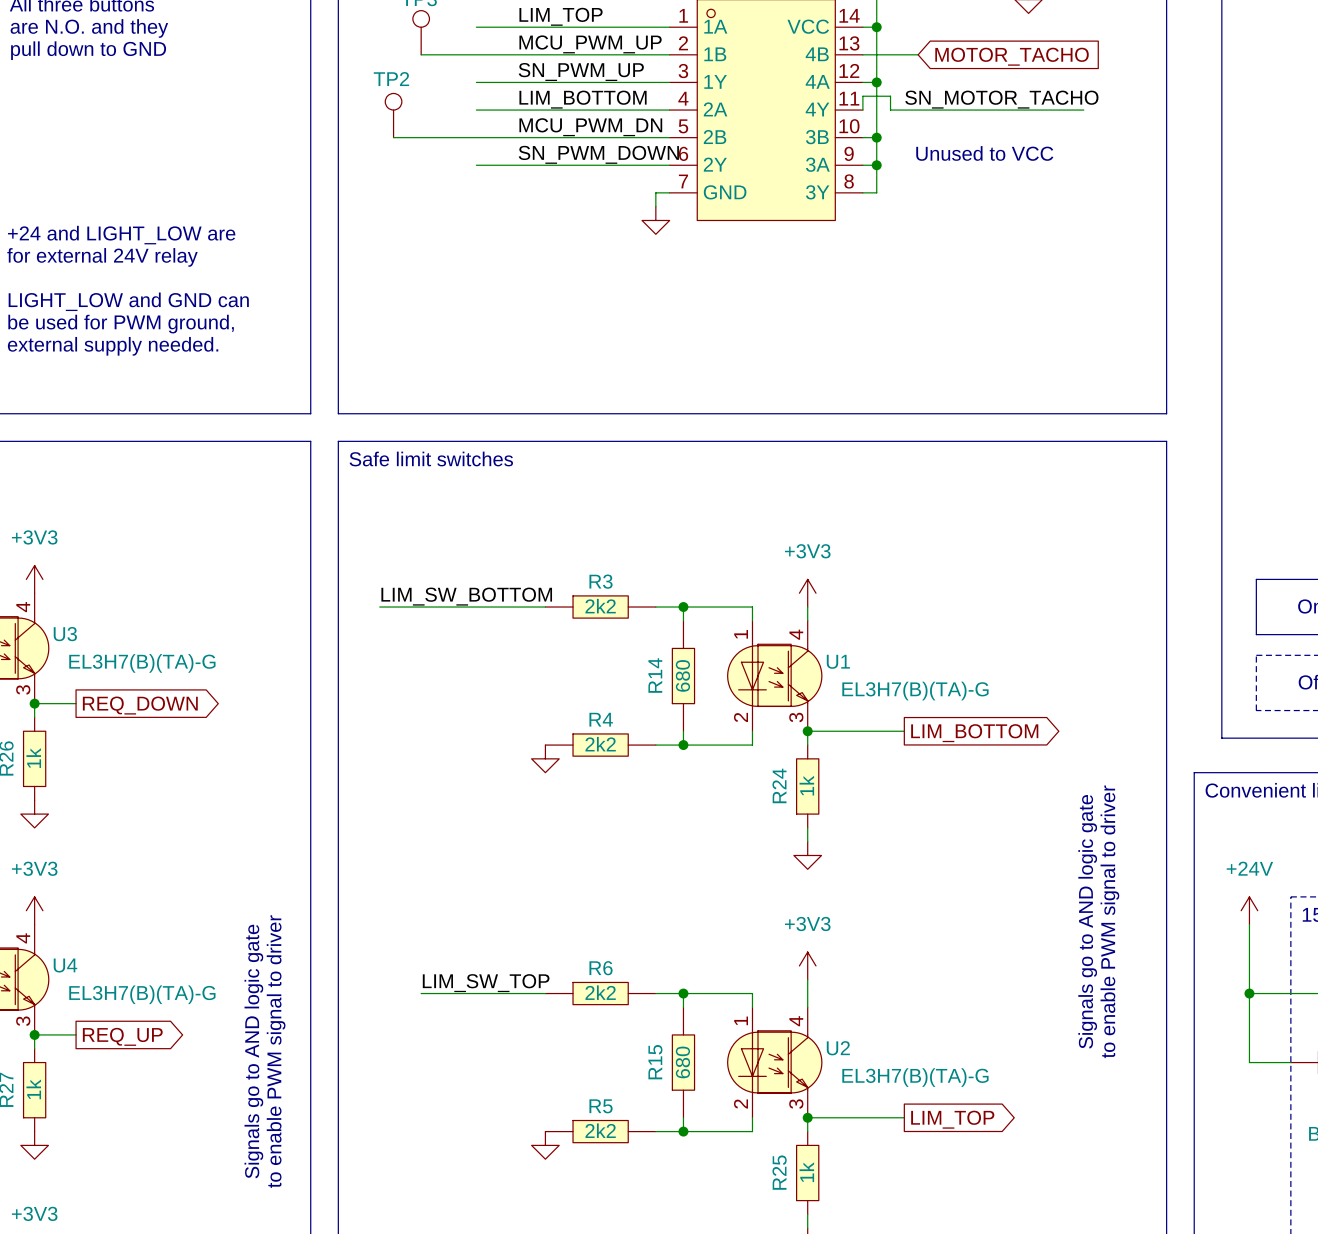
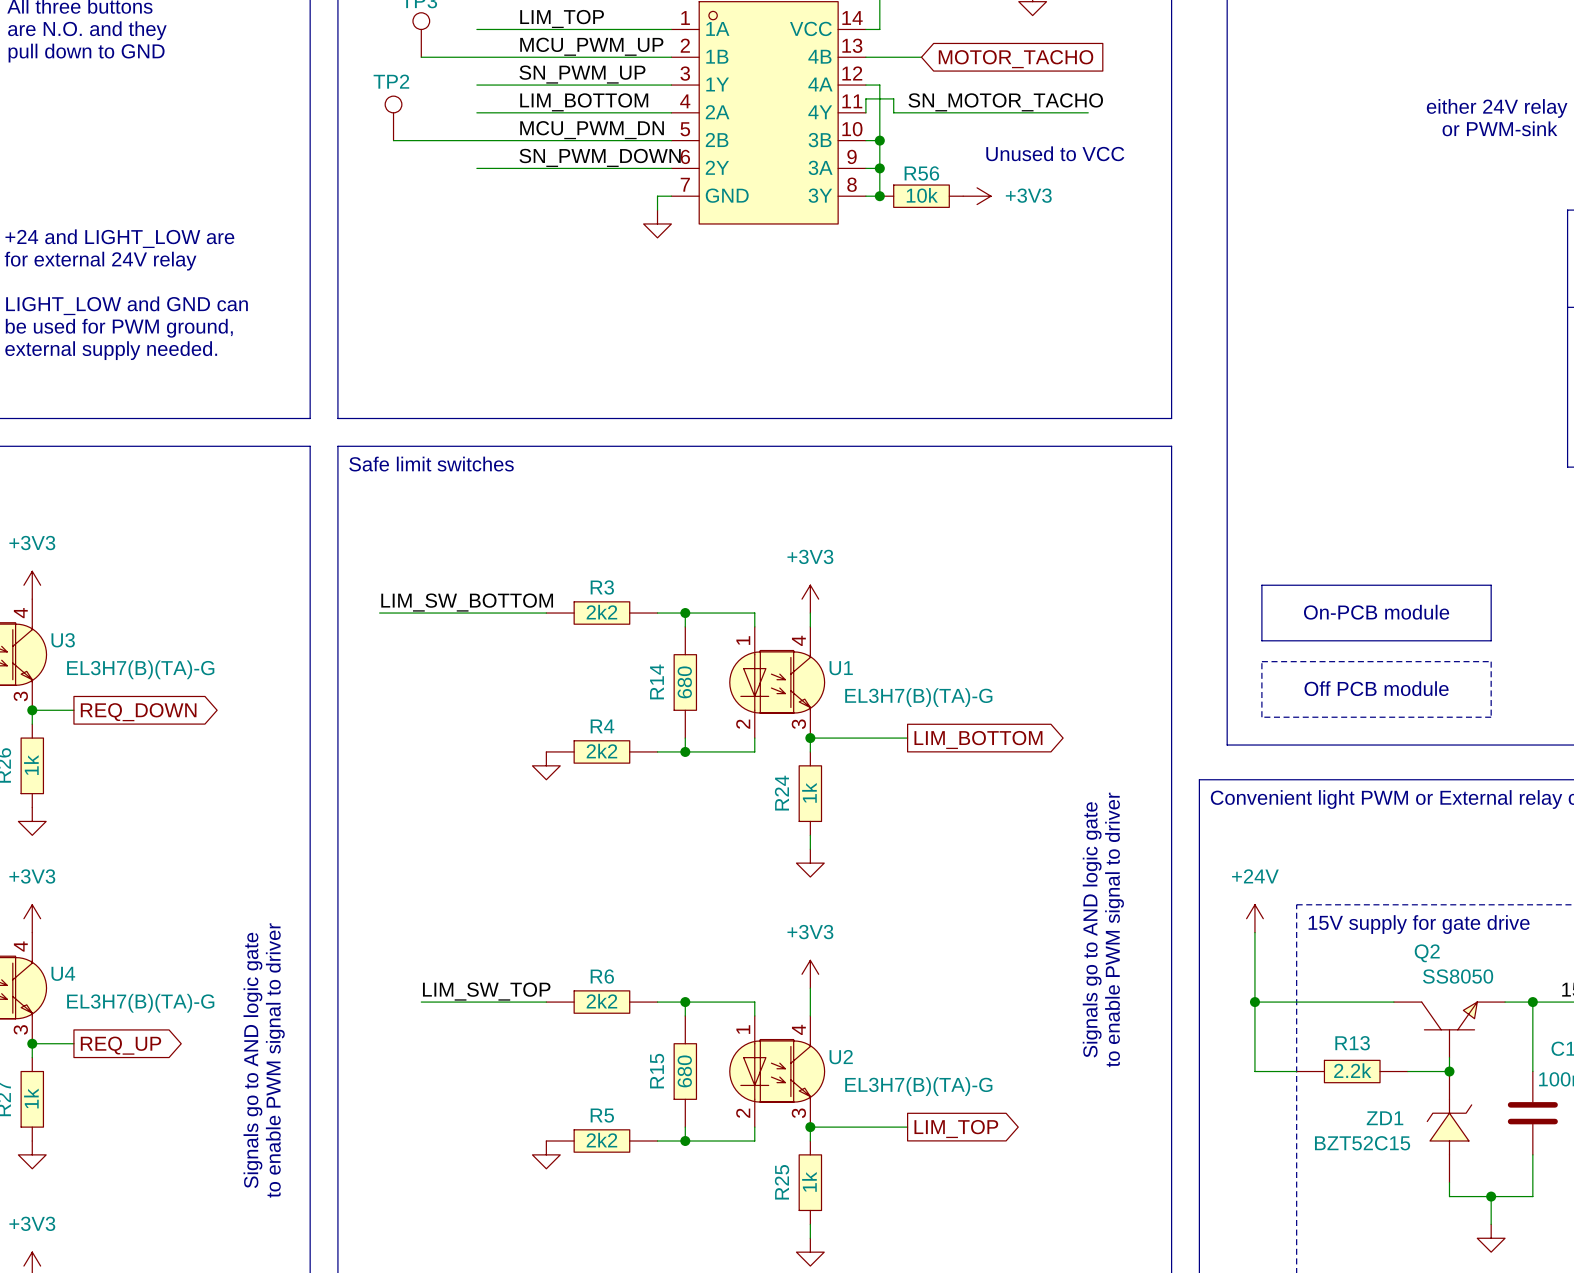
wire: (876, 27) (876, 82) -> none
junction: (876, 27) -> none
junction: (876, 82) -> none
text position: Unused to VCC (984, 153) -> Unused to VCC (1055, 153)
junction: none -> (879, 196)
R56: none -> 10k (921, 196)
power symbol: none -> +3V3 (977, 196)

